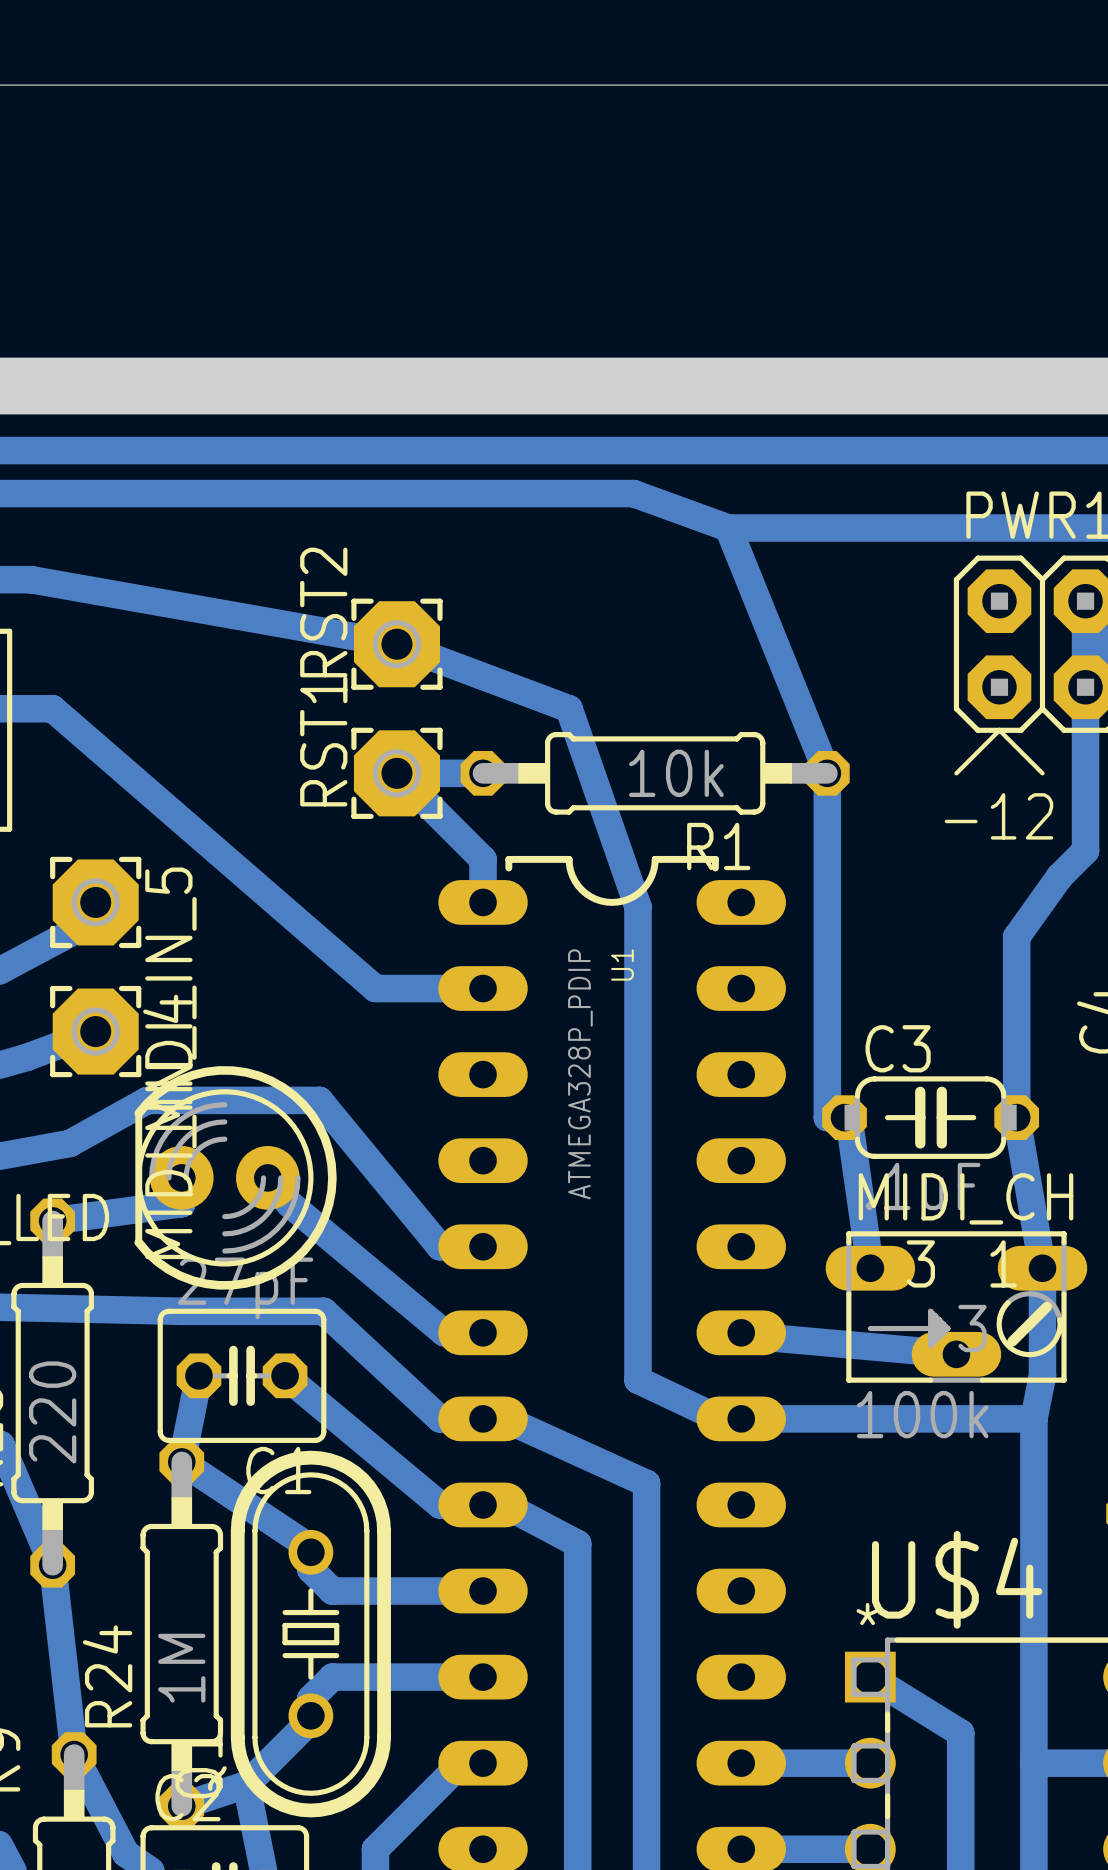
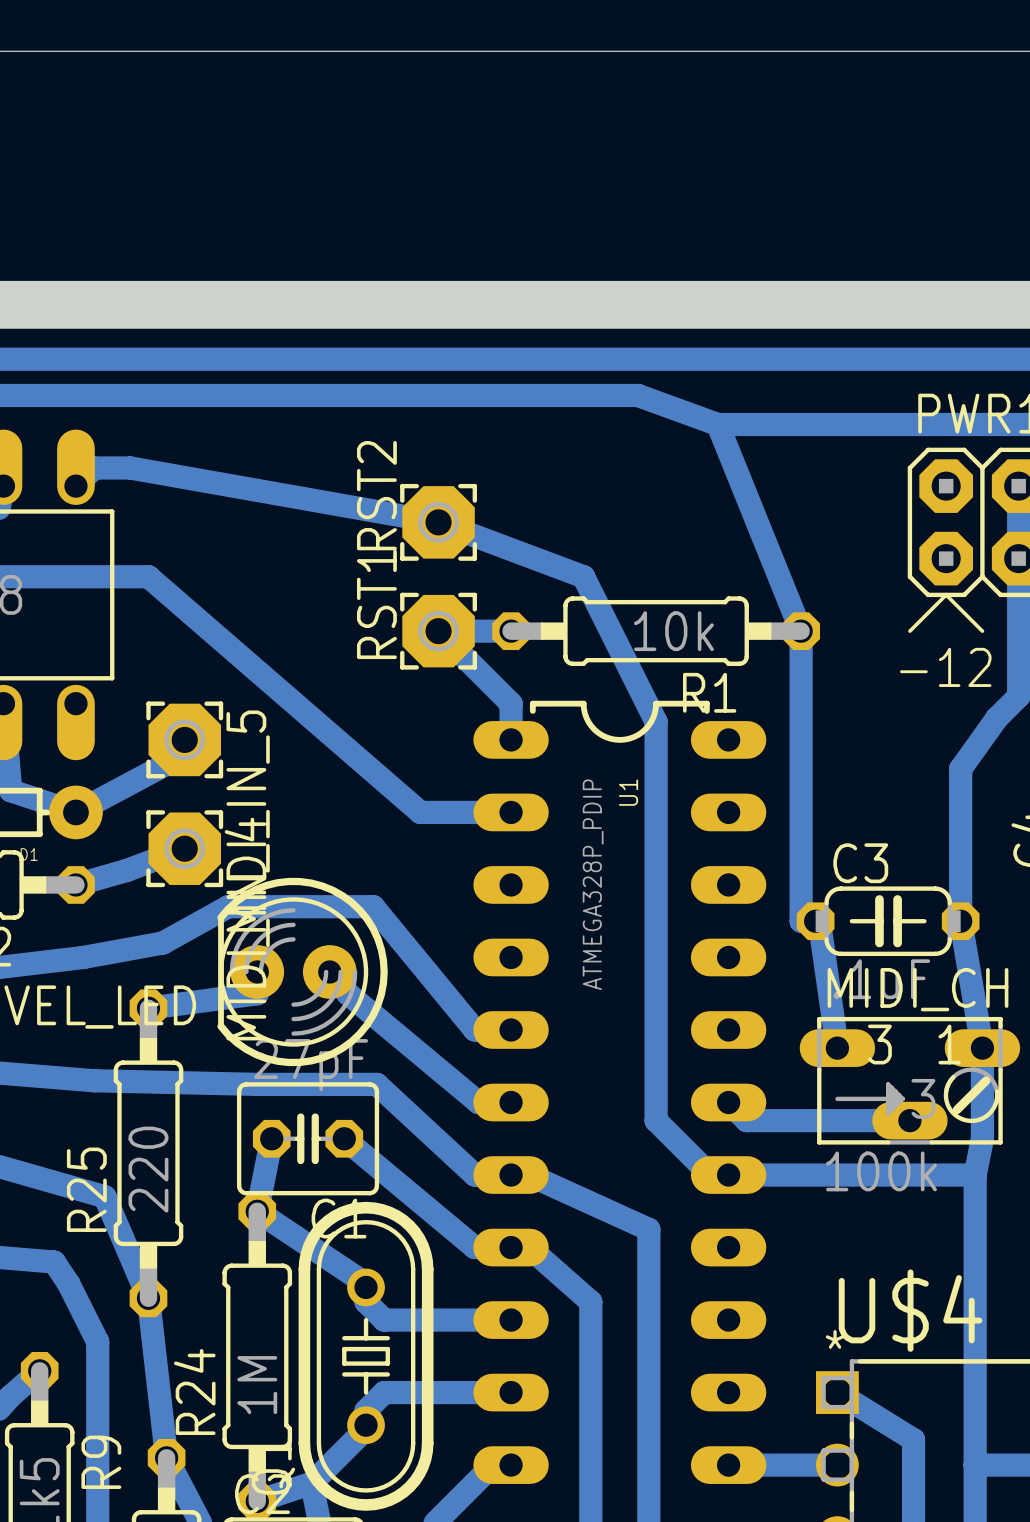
bottom track: (569, 708) (637, 906) (637, 1380) (719, 1418) -> (583, 576) (656, 721) (656, 1120) (710, 1175)
bottom track: (741, 1332) (762, 1337) (956, 1354) -> (728, 1102) (746, 1120) (909, 1120)
bottom track: (504, 1504) (577, 1543) (577, 1569) -> (529, 1247) (590, 1301)

